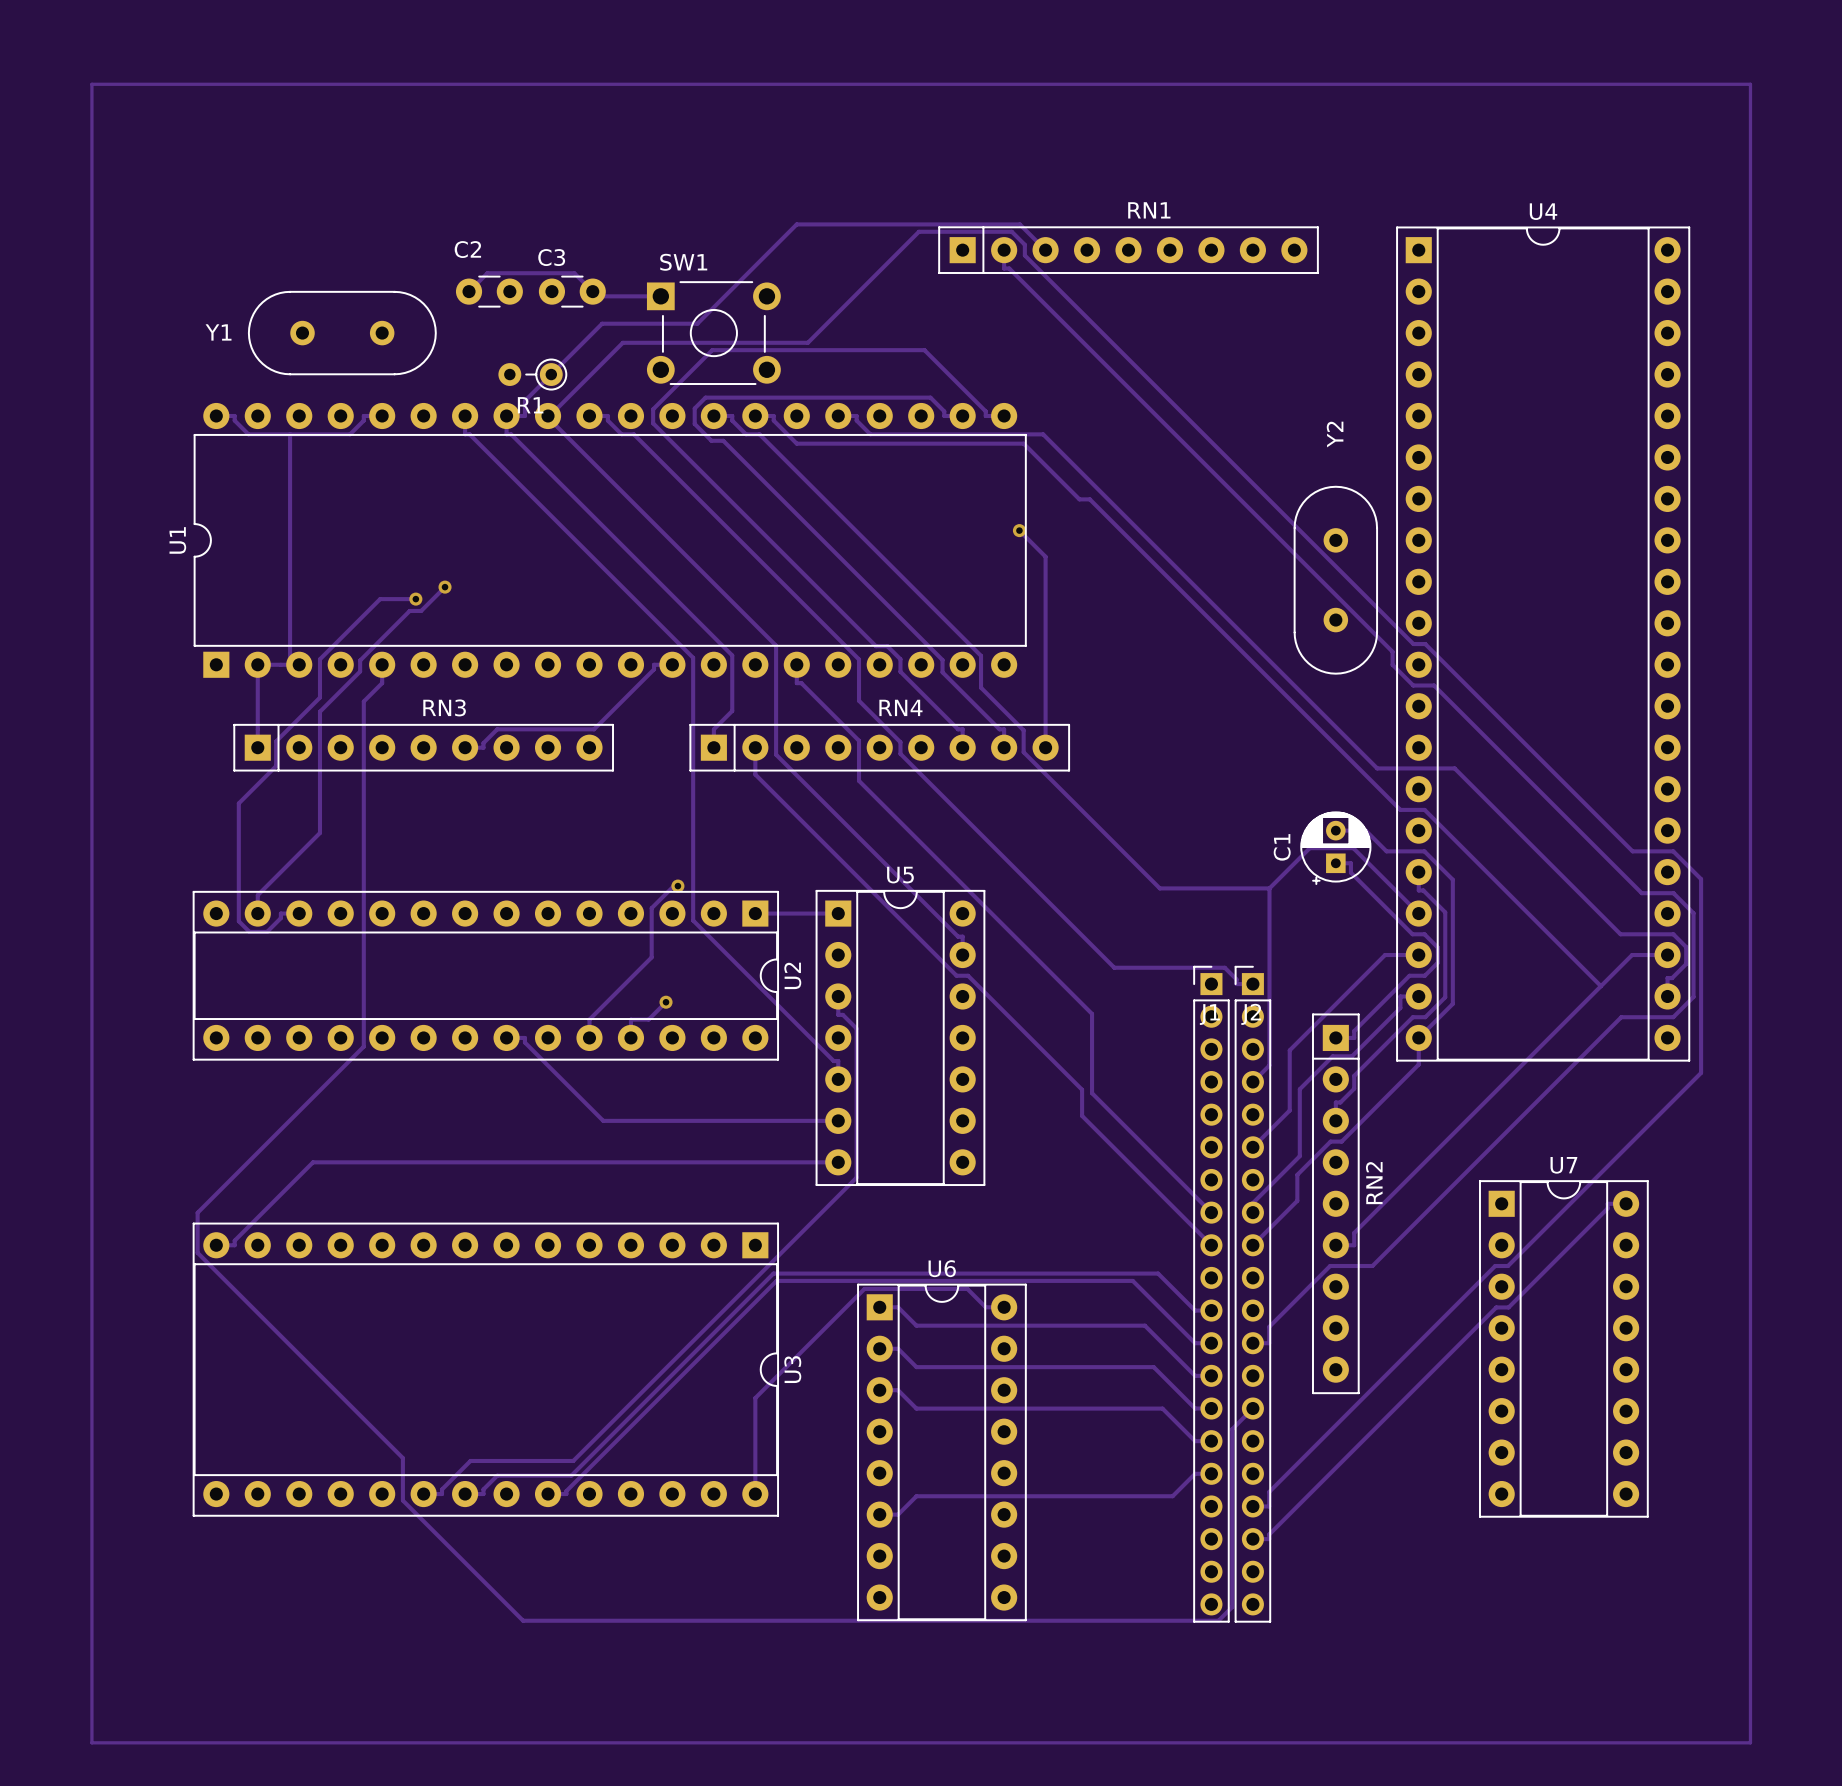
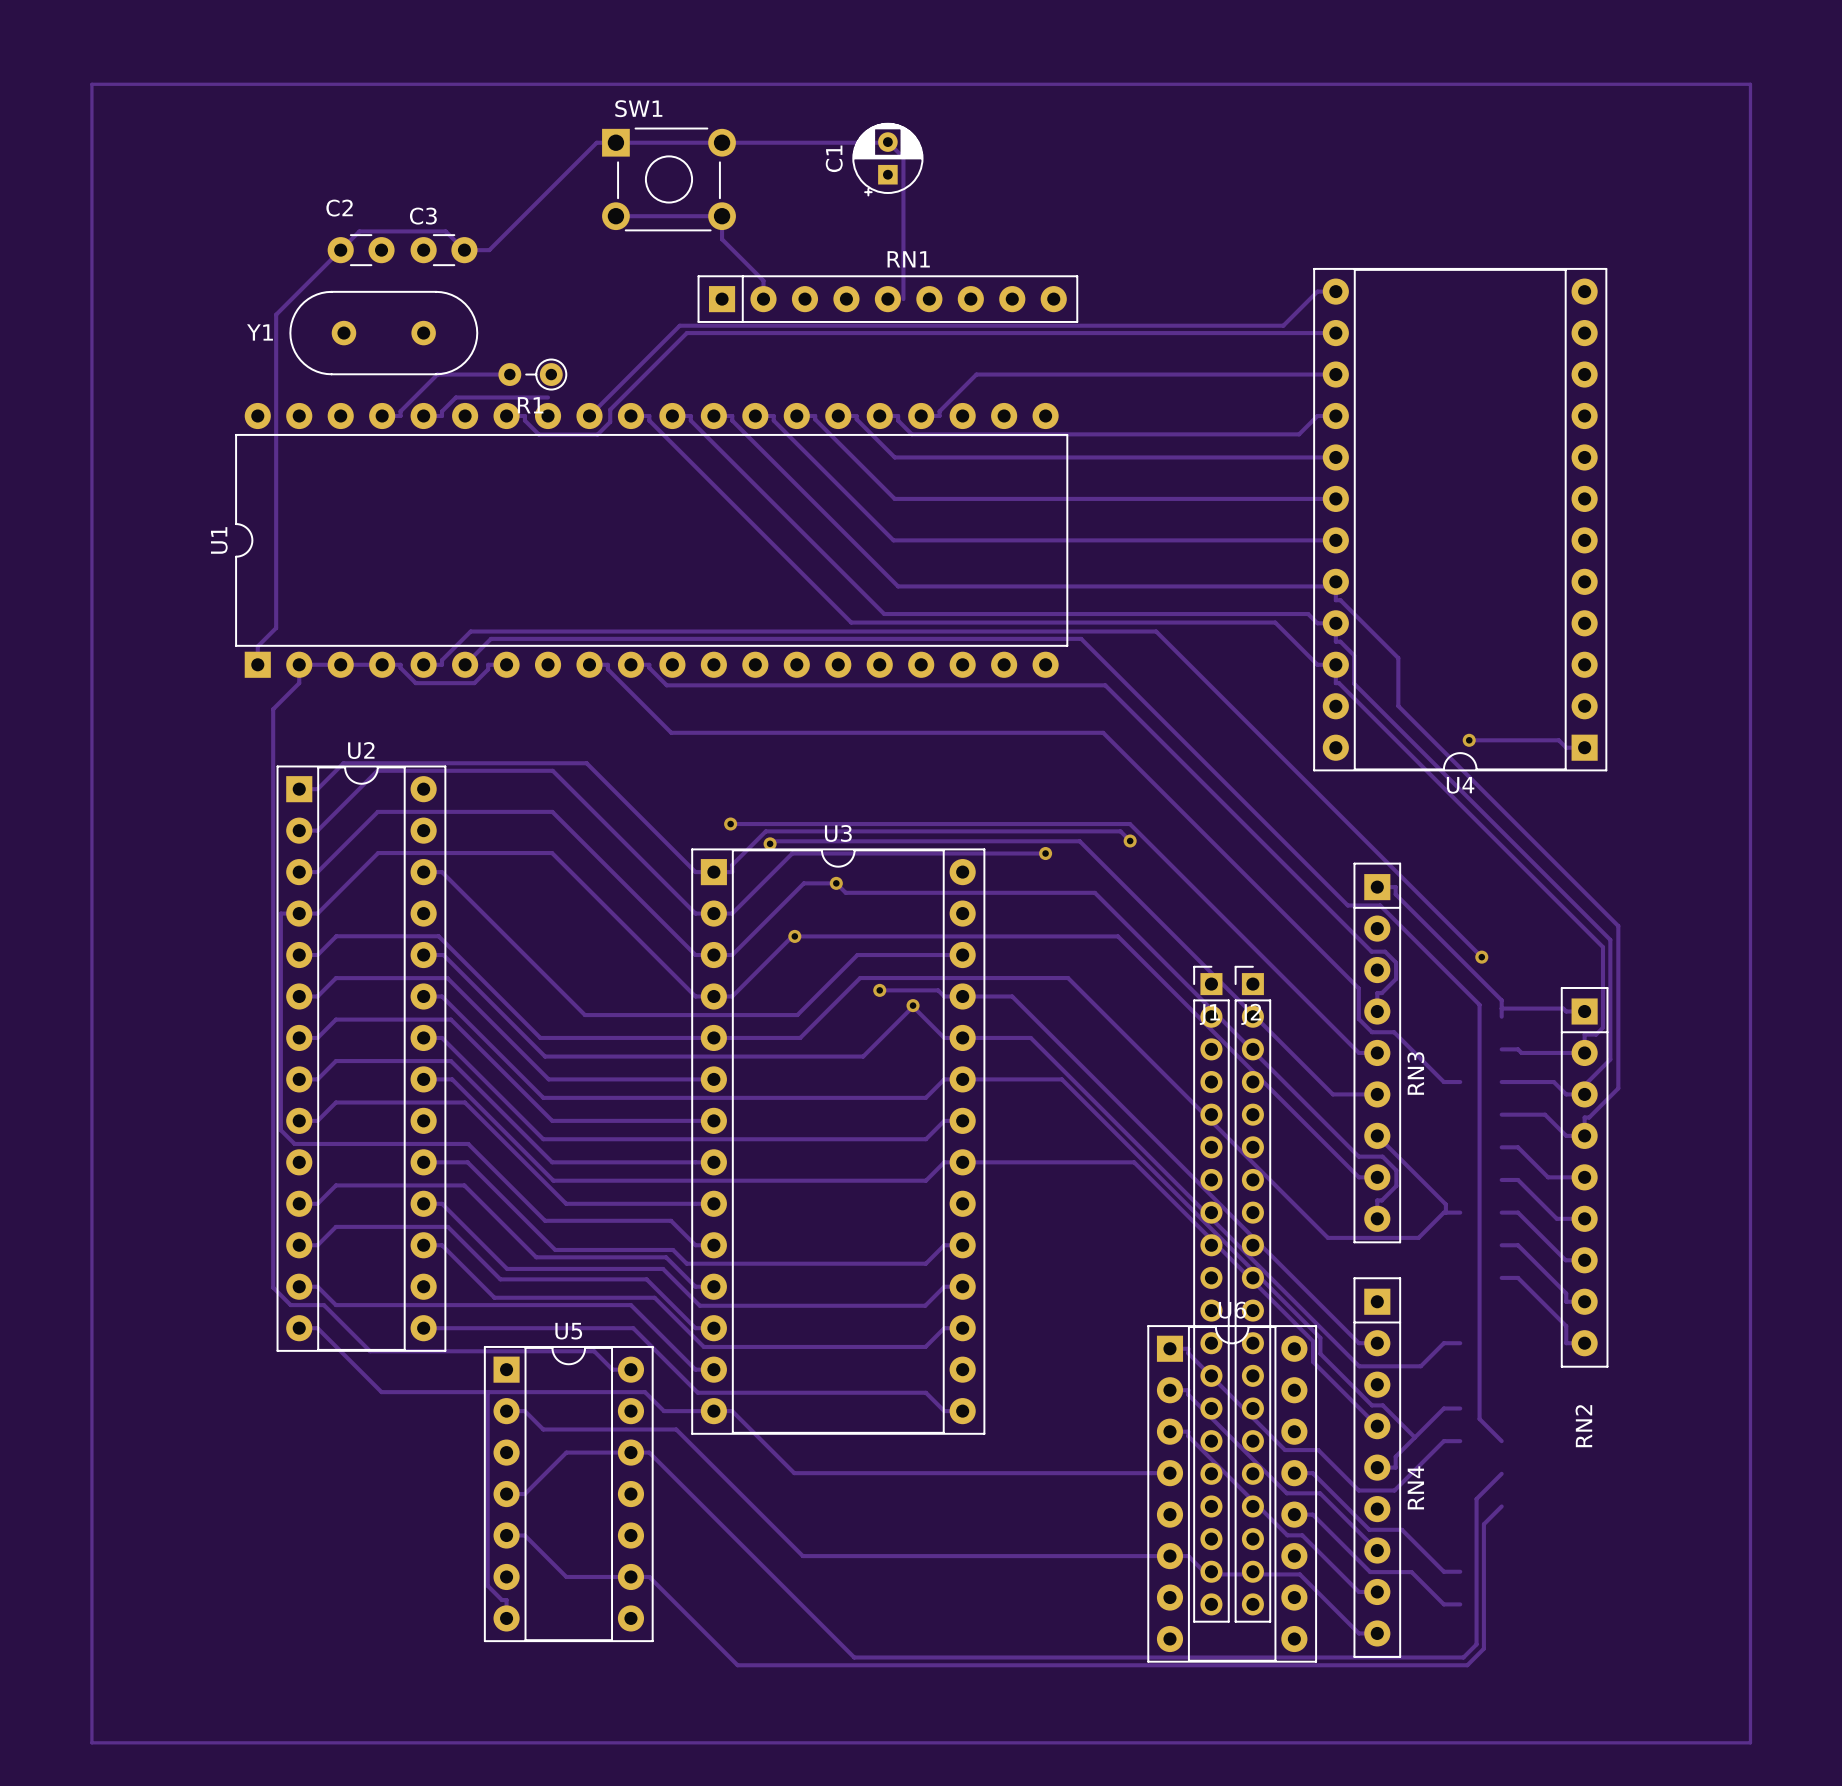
U4 name position: U4 (1543, 211) -> U4 (1460, 785)
track: none -> (615, 216) (722, 216) (722, 239) (763, 280) (763, 299)
U4 footprint: [1396, 226, 1691, 1062] -> [1313, 267, 1608, 772]
track: (1004, 250) (1004, 268) (1009, 268) (1392, 651) (1392, 664) (1413, 685) (1434, 685) (1641, 893) (1673, 893) (1693, 913) (1693, 996) (1673, 1017) (1621, 1017) (1372, 1266) (1330, 1266) (1269, 1326) (1269, 1343) (1252, 1343) -> none
track: (1045, 250) (1019, 224) (796, 224) (697, 323) (602, 323) (524, 400) (524, 415) -> (1335, 333) (686, 333) (610, 409) (610, 421) (597, 434) (538, 434) (524, 420) (524, 415)
RN1 position: (1128, 250) -> (887, 299)
track: (469, 291) (487, 273) (574, 273) (597, 296) (660, 296) -> none
C2 position: (489, 291) -> (361, 250)
C3 position: (572, 291) -> (444, 250)
track: none -> (903, 299) (903, 157) (887, 142) (596, 142) (489, 250) (464, 250) (445, 231) (359, 231) (276, 314) (276, 628) (257, 646) (257, 664)
Y1 position: (342, 333) -> (383, 333)
SW1 position: (713, 333) -> (668, 179)
track: none -> (1335, 374) (976, 374) (939, 411) (939, 415) (921, 415)
track: none -> (548, 397) (455, 397) (442, 411) (442, 415) (423, 415)
track: (216, 415) (234, 415) (234, 420) (248, 434) (350, 434) (363, 420) (363, 415) (382, 415) -> (506, 374) (437, 374) (400, 411) (400, 415) (382, 415)
track: (465, 415) (465, 434) (469, 434) (693, 657) (693, 920) (833, 1061) (838, 1061) (838, 1079) -> none
track: (506, 415) (506, 434) (511, 434) (732, 655) (732, 710) (713, 729) (713, 747) -> none
track: (589, 415) (607, 415) (607, 420) (621, 434) (633, 434) (859, 659) (859, 700) (900, 742) (900, 753) (1114, 967) (1224, 967) (1236, 979) (1236, 984) (1252, 984) -> (589, 415) (679, 325) (1283, 325) (1317, 291) (1335, 291)
track: none -> (630, 415) (649, 415) (649, 420) (851, 622) (1275, 622) (1317, 664) (1335, 664) (1335, 683) (1338, 683) (1602, 947) (1602, 1027) (1596, 1034) (1584, 1034) (1584, 1052) (1521, 1052) (1518, 1049) (1501, 1049)
track: none -> (672, 415) (690, 415) (690, 420) (884, 614) (1308, 614) (1317, 623) (1335, 623) (1335, 641) (1340, 641) (1354, 655) (1354, 683) (1610, 939) (1610, 1059) (1575, 1094)
track: none -> (796, 415) (815, 415) (815, 419) (894, 498) (1335, 498)
track: (962, 415) (944, 415) (944, 411) (930, 397) (705, 397) (694, 408) (694, 423) (711, 440) (723, 440) (942, 660) (942, 672) (999, 729) (1004, 729) (1004, 747) -> none
track: (1004, 415) (985, 415) (985, 411) (924, 350) (712, 350) (653, 409) (653, 423) (876, 646) (887, 646) (900, 659) (900, 671) (958, 729) (962, 729) (962, 747) -> none
track: (856, 419) (870, 434) (911, 434) -> (879, 415) (898, 415) (898, 420) (911, 434)
track: none -> (856, 419) (894, 457) (1335, 457)
track: (290, 434) (290, 664) -> none
track: (746, 434) (759, 434) (981, 655) (981, 687) (1023, 730) (1023, 752) (1159, 888) (1269, 888) -> (746, 434) (898, 586) (1335, 586)
track: (1043, 434) (1377, 768) (1454, 768) (1620, 934) (1673, 934) (1686, 947) (1686, 964) (1672, 978) (1667, 978) (1667, 996) -> (1043, 434) (1299, 434) (1317, 415) (1335, 415)
track: (796, 443) (1023, 443) (1079, 499) (1089, 499) (1400, 809) (1424, 809) (1600, 986) -> (796, 443) (893, 540) (1335, 540)
track: (1019, 530) (1045, 556) (1045, 747) -> none
via: (1019, 530) -> none
U1 position: (610, 540) -> (651, 540)
Y2: (1335, 580) -> none
track: none -> (1335, 581) (1335, 600) (1340, 600) (1398, 658) (1398, 706) (1618, 926) (1618, 1088) (1589, 1117) (1584, 1117) (1584, 1135) (1566, 1135) (1545, 1114) (1501, 1114)
track: (445, 587) (421, 610) (409, 610) (360, 660) (360, 671) (319, 711) (319, 832) (257, 895) (257, 913) -> none
via: (445, 587) -> none
track: (415, 599) (380, 599) (319, 659) (319, 697) (276, 741) (276, 766) (238, 803) (238, 921) (249, 931) (267, 931) (280, 918) (280, 913) -> (713, 1245) (695, 1245) (671, 1220) (545, 1220) (468, 1143) (294, 1143) (280, 1130) (280, 913)
via: (415, 599) -> none
track: (299, 664) (257, 664) (257, 747) -> none
track: (382, 664) (382, 683) (363, 701) (363, 1046) (197, 1212) (197, 1252) (402, 1458) (402, 1500) (523, 1620) (1218, 1620) (1232, 1607) (1232, 1429) (1252, 1408) -> none
track: none -> (423, 664) (442, 664) (442, 660) (470, 631) (1156, 631) (1481, 957)
track: none -> (465, 664) (491, 638) (1081, 638) (1347, 905) (1380, 905) (1479, 1004) (1479, 1419) (1501, 1441)
track: none -> (506, 664) (488, 664) (488, 669) (474, 683) (415, 683) (400, 667) (400, 664) (299, 664) (299, 683) (273, 709) (273, 1287) (290, 1305) (323, 1305) (370, 1351) (594, 1351) (612, 1369) (630, 1369)
track: none -> (589, 664) (607, 664) (607, 669) (671, 732) (1103, 732) (1358, 988) (1358, 1019) (1372, 1032) (1394, 1032) (1443, 1082) (1460, 1082)
track: none -> (630, 664) (649, 664) (649, 667) (666, 685) (1105, 685) (1371, 951) (1385, 951) (1396, 962) (1396, 978) (1381, 993) (1377, 993) (1377, 1011)
track: (672, 664) (654, 664) (654, 669) (594, 729) (497, 729) (483, 743) (483, 747) (465, 747) -> none
track: (796, 664) (796, 683) (801, 683) (859, 740) (859, 780) (1092, 1013) (1092, 1093) (1211, 1212) -> none
track: none -> (1469, 740) (1558, 740) (1566, 747) (1584, 747)
via: none -> (1469, 740)
RN3 rotation: 0° (423, 747) -> 90° clockwise (1377, 1052)
RN3 position: (423, 747) -> (1377, 1052)
track: (755, 747) (755, 774) (956, 975) (968, 975) (1082, 1089) (1082, 1115) (1211, 1245) -> none
RN4 rotation: 0° (879, 747) -> 90° clockwise (1377, 1467)
RN4 position: (879, 747) -> (1377, 1467)
track: none -> (299, 789) (317, 789) (343, 763) (586, 763) (695, 872) (732, 872) (732, 864) (765, 831) (1120, 831) (1130, 841)
track: none -> (730, 824) (1129, 824) (1358, 1052) (1377, 1052)
via: none -> (730, 824)
track: none -> (299, 830) (317, 830) (377, 770) (552, 770) (695, 913) (732, 913) (792, 853) (1045, 853)
track: (1335, 830) (1365, 830) (1386, 851) (1424, 851) (1452, 879) (1452, 1003) (1418, 1037) (1418, 1064) (1341, 1141) (1330, 1141) (1297, 1174) (1297, 1200) (1252, 1245) -> none
via: none -> (1130, 841)
track: none -> (770, 843) (772, 841) (1079, 841) (1332, 1094) (1377, 1094)
via: none -> (770, 843)
C1 position: (1335, 848) -> (887, 159)
via: none -> (1045, 853)
track: (1335, 863) (1350, 863) (1350, 872) (1412, 934) (1424, 934) (1437, 947) (1437, 962) (1424, 975) (1409, 975) (1354, 1031) (1354, 1037) (1335, 1037) -> none
track: none -> (299, 872) (317, 872) (377, 811) (552, 811) (695, 955) (732, 955) (803, 883) (836, 883) (845, 892) (1094, 892) (1358, 1156) (1382, 1156) (1396, 1170) (1396, 1185) (1381, 1200) (1377, 1200) (1377, 1218)
track: (1418, 872) (1418, 890) (1423, 890) (1445, 912) (1445, 997) (1425, 1017) (1412, 1017) (1354, 1075) (1354, 1088) (1340, 1102) (1335, 1102) (1335, 1120) -> none
via: none -> (836, 883)
track: (677, 886) (673, 886) (651, 908) (651, 957) (589, 1019) (589, 1037) -> none
via: (677, 886) -> none
track: none -> (1377, 887) (1395, 887) (1395, 894) (1501, 1000) (1501, 1016)
track: (1269, 888) (1309, 848) (1353, 848) (1418, 913) -> none
track: (1269, 888) (1269, 1065) (1252, 1082) -> none
track: none -> (299, 913) (317, 913) (378, 853) (552, 853) (695, 996) (732, 996) (792, 936) (1118, 936) (1358, 1177) (1377, 1177)
track: (755, 913) (838, 913) -> none
via: none -> (794, 936)
track: none -> (299, 955) (317, 955) (336, 936) (438, 936) (540, 1037) (800, 1037) (860, 978) (1068, 978) (1327, 1237) (1418, 1237) (1443, 1212) (1460, 1212)
track: none -> (423, 955) (443, 955) (545, 1056) (863, 1056) (913, 1006)
track: (962, 955) (962, 936) (958, 936) (776, 754) (776, 645) (548, 417) (622, 342) (807, 342) (918, 231) (1011, 231) (1024, 244) (1024, 255) (1413, 644) (1425, 644) (1632, 851) (1673, 851) (1701, 879) (1701, 1072) (1508, 1266) (1495, 1266) (1269, 1491) (1269, 1506) (1252, 1506) -> (962, 955) (857, 955) (797, 1015) (584, 1015) (442, 872) (423, 872)
track: (1418, 955) (1385, 955) (1289, 1050) (1289, 1110) (1252, 1147) -> none
track: (1667, 955) (1632, 955) (1354, 1232) (1354, 1245) (1335, 1245) -> none
via: none -> (1481, 957)
U2 rotation: 0° (485, 975) -> 90° counterclockwise (361, 1058)
track: none -> (879, 990) (938, 990) (944, 996) (1012, 996) (1358, 1343) (1377, 1343)
via: none -> (879, 990)
track: none -> (299, 996) (317, 996) (335, 978) (447, 978) (548, 1079) (713, 1079)
track: none -> (423, 996) (442, 996) (543, 1097) (925, 1097) (944, 1079) (1061, 1079) (1320, 1337) (1320, 1353) (1371, 1405) (1382, 1405) (1414, 1437)
track: (838, 996) (838, 1014) (842, 1014) (856, 1028) (856, 1177) (573, 1460) (470, 1460) (442, 1489) (442, 1494) (423, 1494) -> none
track: (1418, 996) (1400, 996) (1400, 1007) (1352, 1056) (1332, 1056) (1299, 1089) (1299, 1156) (1252, 1203) (1252, 1212) -> none
track: (666, 1002) (648, 1019) (630, 1019) (630, 1037) -> none
via: (666, 1002) -> none
via: none -> (913, 1005)
track: none -> (913, 1006) (944, 1037) (1030, 1037) (1359, 1366) (1420, 1366) (1443, 1343) (1460, 1343)
track: none -> (1501, 1008) (1563, 1008) (1566, 1011) (1584, 1011)
track: none -> (423, 1037) (442, 1037) (543, 1139) (925, 1139) (944, 1120) (962, 1120)
track: (506, 1037) (524, 1037) (524, 1042) (603, 1120) -> (299, 1037) (317, 1037) (335, 1019) (450, 1019) (552, 1120) (603, 1120)
U5 position: (900, 1037) -> (568, 1494)
track: none -> (423, 1079) (452, 1079) (553, 1180) (925, 1180) (944, 1162) (1134, 1162) (1313, 1341) (1313, 1361) (1377, 1426)
track: none -> (1501, 1082) (1553, 1082) (1566, 1094) (1584, 1094)
track: none -> (299, 1120) (317, 1120) (335, 1102) (464, 1102) (566, 1203) (713, 1203)
track: (713, 1120) (838, 1120) -> none
track: none -> (1377, 1135) (1445, 1204) (1445, 1212)
track: none -> (1501, 1147) (1518, 1147) (1548, 1177) (1584, 1177)
track: (423, 1162) (313, 1162) (234, 1240) (234, 1245) (216, 1245) -> none
track: (467, 1162) (552, 1162) -> (299, 1079) (317, 1079) (335, 1061) (450, 1061) (552, 1162)
track: none -> (467, 1162) (555, 1249) (673, 1249) (686, 1263) (925, 1263) (944, 1245) (962, 1245)
track: (713, 1162) (838, 1162) -> none
track: none -> (1501, 1179) (1518, 1179) (1556, 1218) (1584, 1218)
RN2 name position: RN2 (1374, 1183) -> RN2 (1583, 1426)
track: none -> (299, 1203) (317, 1203) (335, 1185) (464, 1185) (536, 1257) (666, 1257) (695, 1286) (713, 1286)
track: none -> (423, 1203) (442, 1203) (507, 1268) (663, 1268) (699, 1305) (925, 1305) (944, 1286) (962, 1286)
RN2 position: (1335, 1203) -> (1584, 1177)
track: (1626, 1203) (1607, 1203) (1607, 1208) (1508, 1307) (1496, 1307) (1269, 1534) (1269, 1539) (1252, 1539) -> none
track: none -> (1501, 1212) (1518, 1212) (1565, 1260) (1584, 1260)
track: none -> (299, 1245) (317, 1245) (335, 1226) (447, 1226) (500, 1279) (646, 1279) (695, 1328) (713, 1328)
track: none -> (423, 1245) (442, 1245) (494, 1297) (654, 1297) (703, 1346) (925, 1346) (944, 1328) (962, 1328)
track: none -> (1501, 1245) (1518, 1245) (1566, 1293) (1566, 1301) (1584, 1301)
track: none -> (1501, 1277) (1518, 1277) (1566, 1326) (1566, 1343) (1584, 1343)
track: none -> (299, 1286) (317, 1286) (335, 1305) (630, 1305) (695, 1369) (713, 1369)
track: (879, 1307) (898, 1307) (916, 1325) (1144, 1325) (1195, 1375) (1211, 1375) -> none
track: (1004, 1307) (985, 1307) (967, 1288) (864, 1288) (755, 1398) (755, 1494) -> none
track: (1211, 1310) (1195, 1310) (1158, 1273) (773, 1273) (571, 1475) (497, 1475) (483, 1489) (483, 1494) (465, 1494) -> none
track: none -> (299, 1328) (317, 1328) (381, 1392) (645, 1392) (663, 1411) (732, 1411) (794, 1473) (1169, 1473)
track: none -> (423, 1328) (633, 1328) (697, 1392) (925, 1392) (944, 1411) (962, 1411)
track: (1211, 1343) (1195, 1343) (1132, 1280) (776, 1280) (566, 1491) (566, 1494) (548, 1494) -> none
track: (879, 1348) (898, 1348) (916, 1367) (1153, 1367) (1195, 1408) (1211, 1408) -> none
track: none -> (1169, 1348) (1188, 1348) (1188, 1353) (1285, 1450) (1318, 1450) (1358, 1490) (1394, 1490) (1443, 1441) (1460, 1441)
U7: (1563, 1348) -> none
U3 rotation: 0° (485, 1369) -> 90° counterclockwise (838, 1141)
U3 position: (485, 1369) -> (838, 1141)
track: (879, 1390) (898, 1390) (916, 1408) (1162, 1408) (1195, 1441) (1211, 1441) -> none
track: none -> (1169, 1390) (1188, 1390) (1188, 1394) (1286, 1493) (1320, 1493) (1377, 1550)
track: none -> (487, 1392) (487, 1585) (501, 1600) (506, 1600) (506, 1618)
track: none -> (1460, 1408) (1443, 1408) (1395, 1456) (1395, 1467) (1377, 1467)
track: none -> (506, 1411) (524, 1411) (543, 1429) (676, 1429) (802, 1556) (1188, 1556) (1206, 1574) (1299, 1574) (1358, 1633) (1377, 1633)
track: none -> (1169, 1431) (1188, 1431) (1188, 1436) (1287, 1535) (1302, 1535) (1358, 1591) (1377, 1591)
U6 position: (941, 1452) -> (1232, 1493)
track: (1211, 1473) (1195, 1473) (1172, 1496) (916, 1496) (898, 1514) (879, 1514) -> none
track: none -> (1294, 1473) (1312, 1473) (1369, 1529) (1401, 1529) (1443, 1571) (1460, 1571)
track: none -> (1501, 1473) (1476, 1498) (1476, 1644) (1463, 1657) (854, 1657) (649, 1452) (566, 1452) (524, 1494) (506, 1494)
track: none -> (1501, 1506) (1483, 1524) (1483, 1648) (1467, 1665) (737, 1665) (649, 1576) (566, 1576) (524, 1535) (506, 1535)
track: none -> (1294, 1514) (1312, 1514) (1370, 1572) (1411, 1572) (1443, 1604) (1460, 1604)

